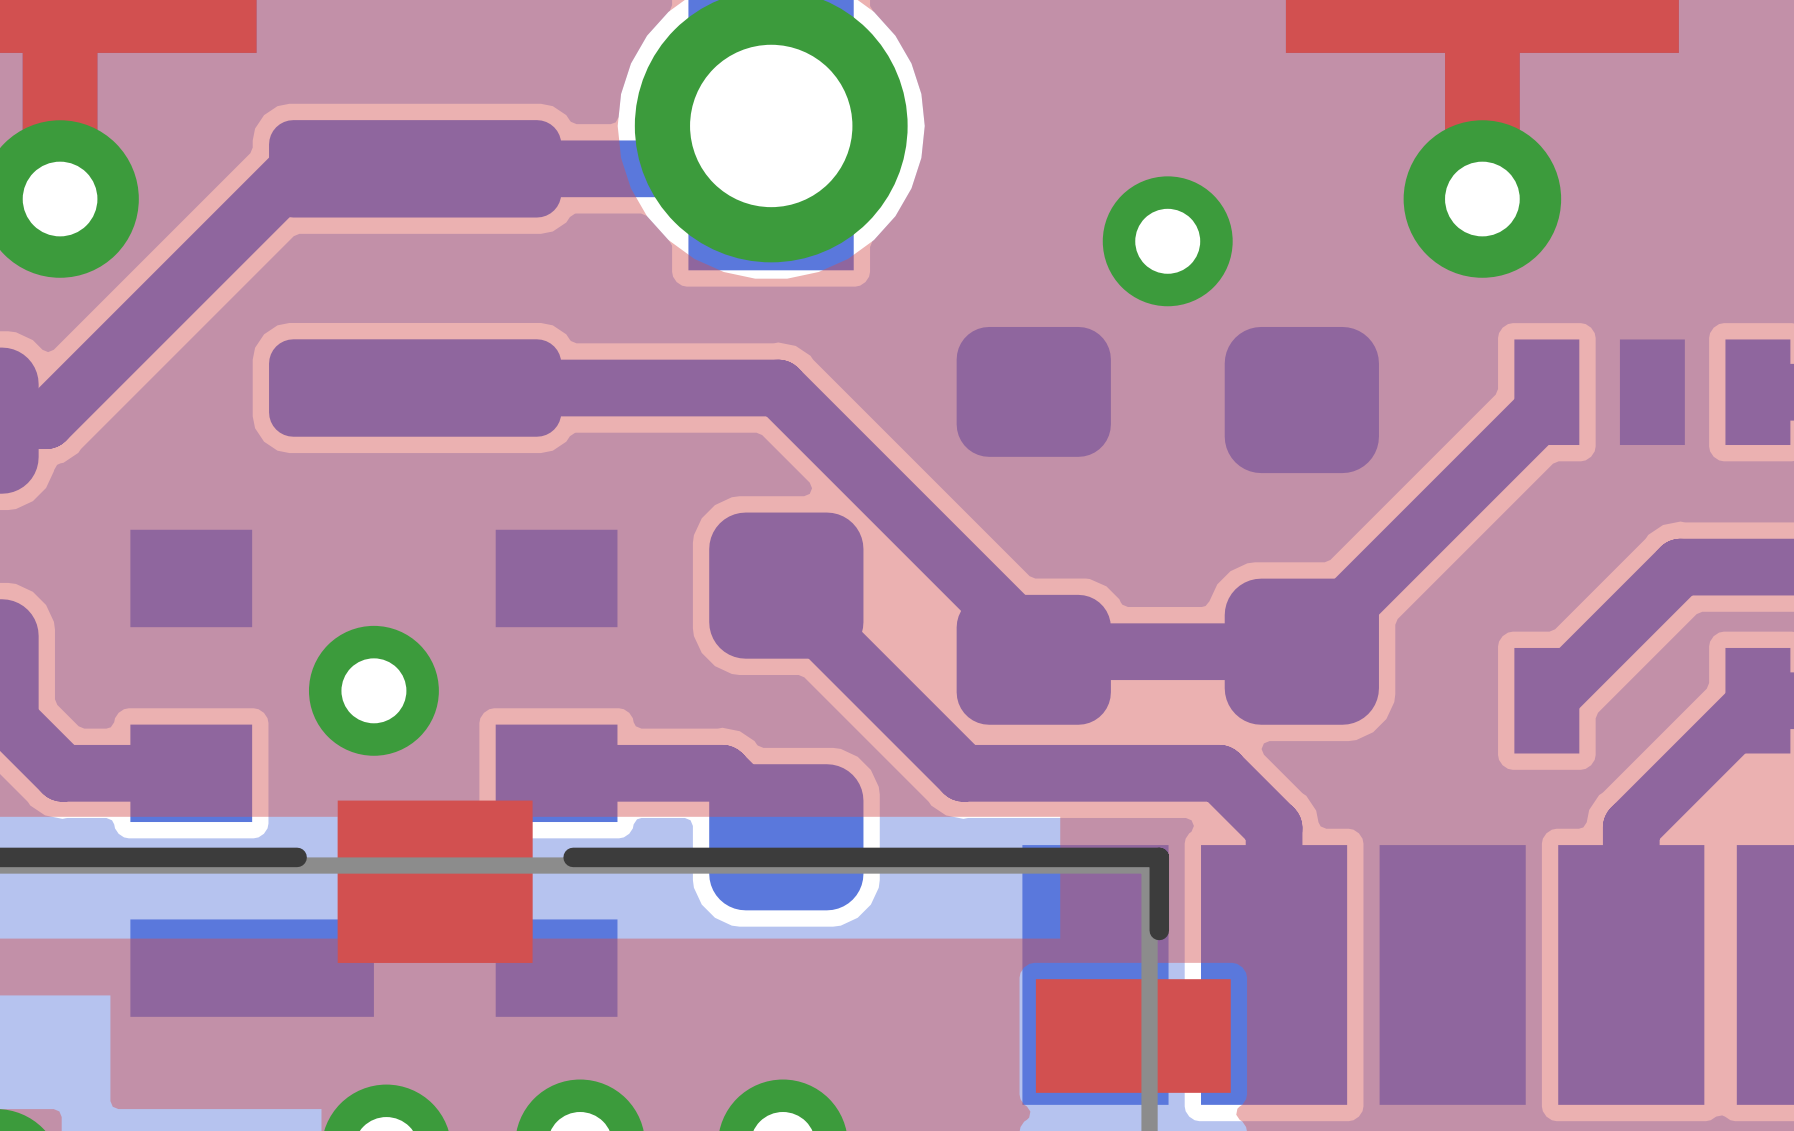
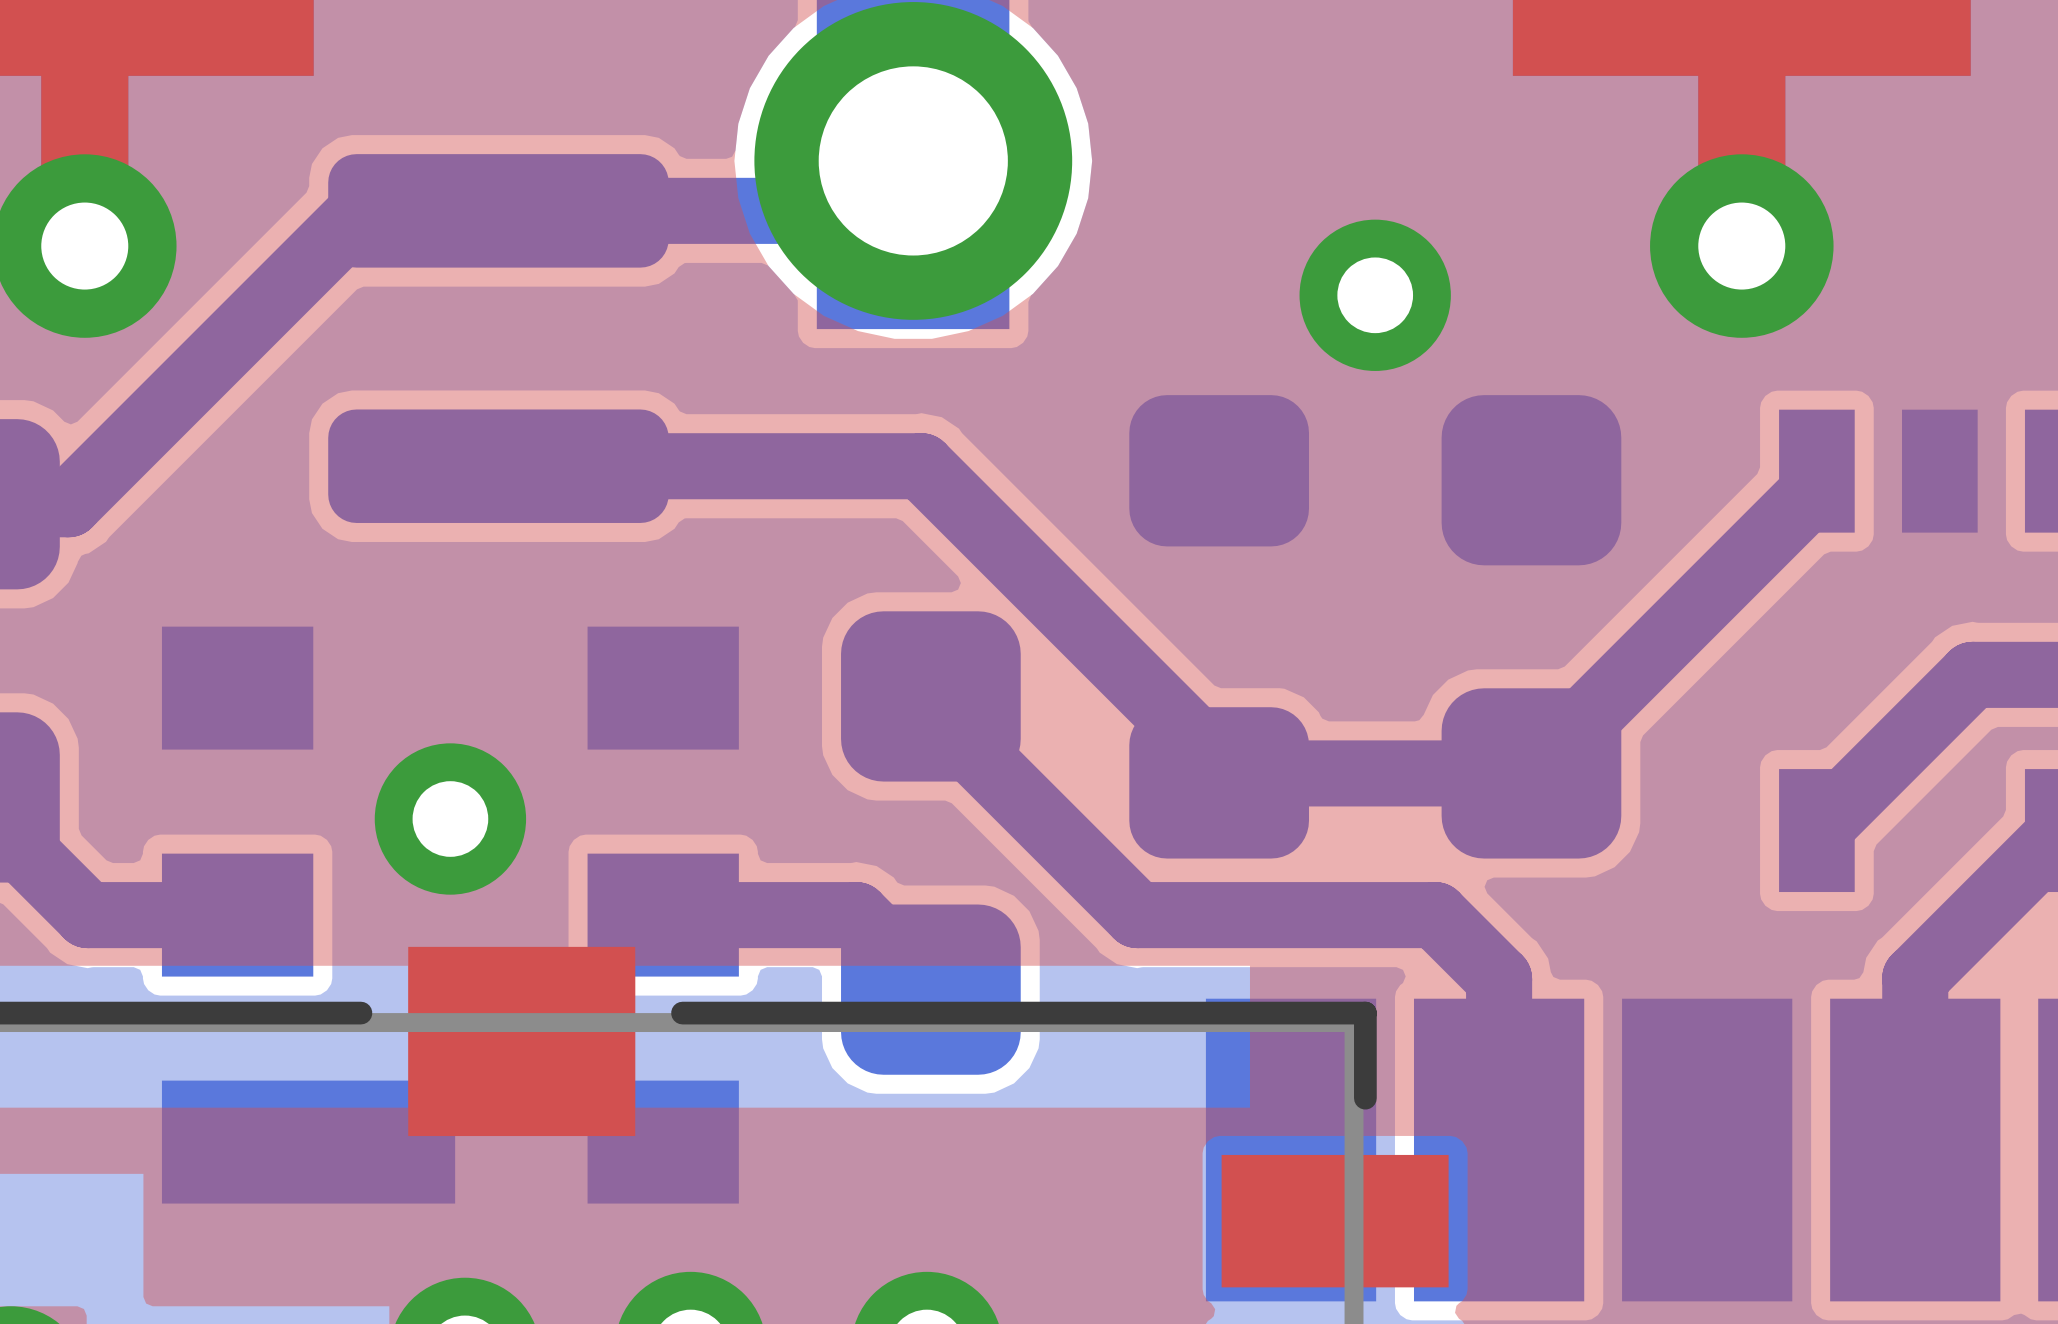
part footprint: [130, 529, 618, 1017] -> [161, 626, 739, 1204]

